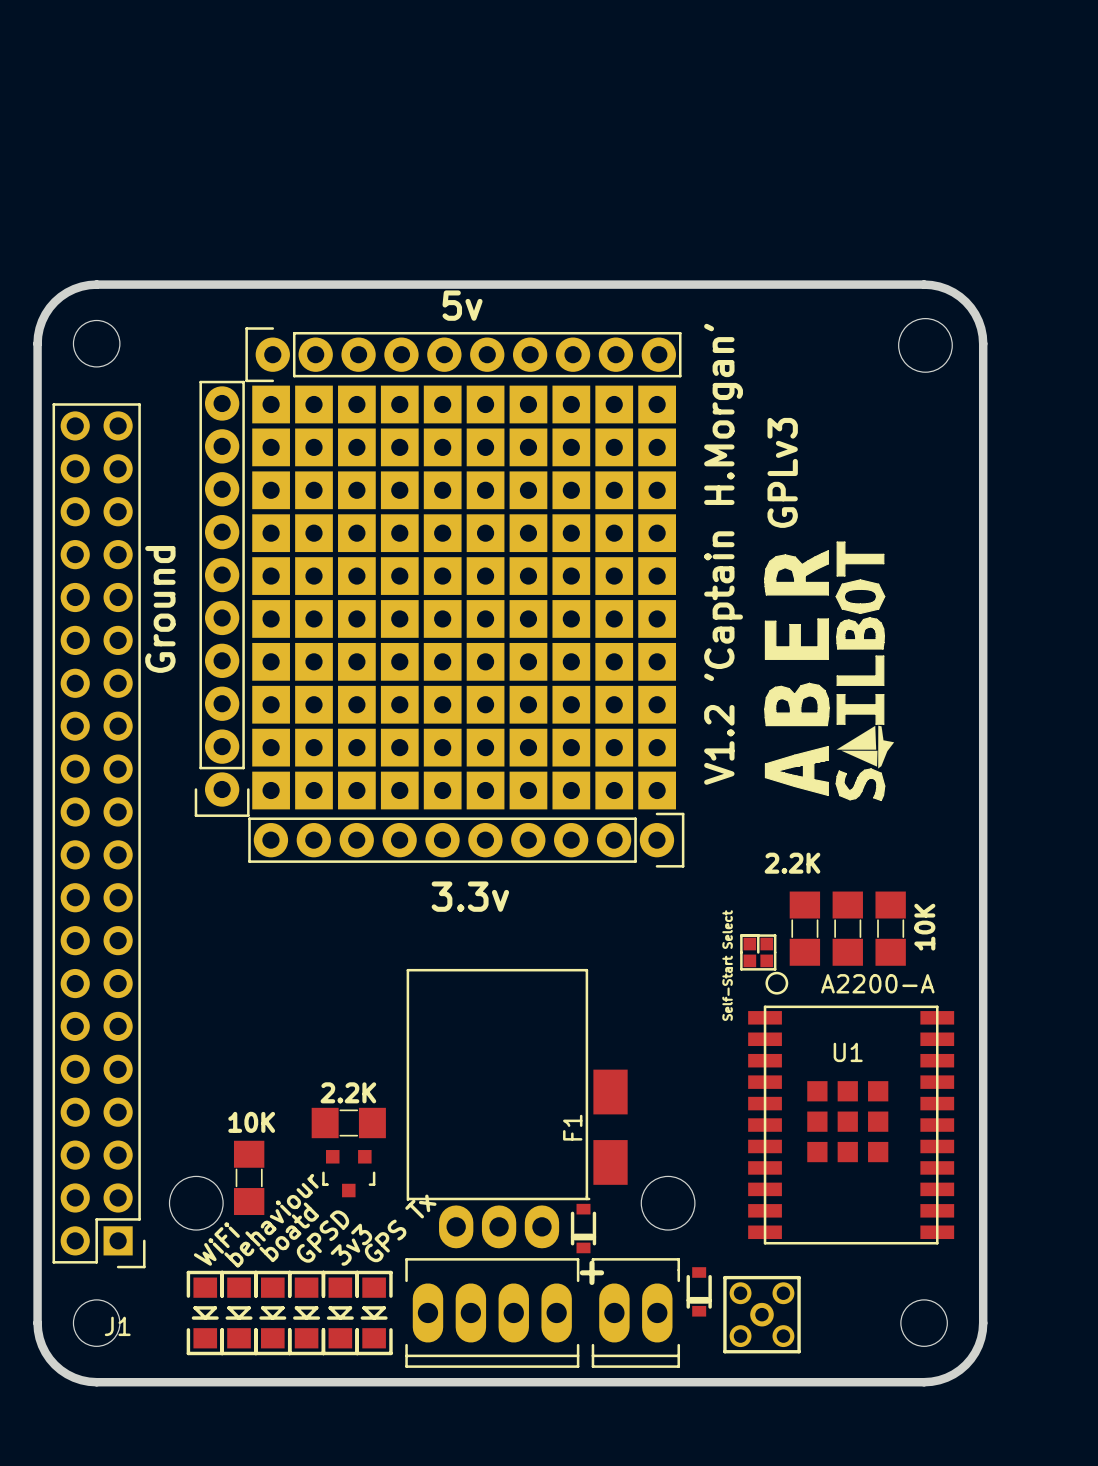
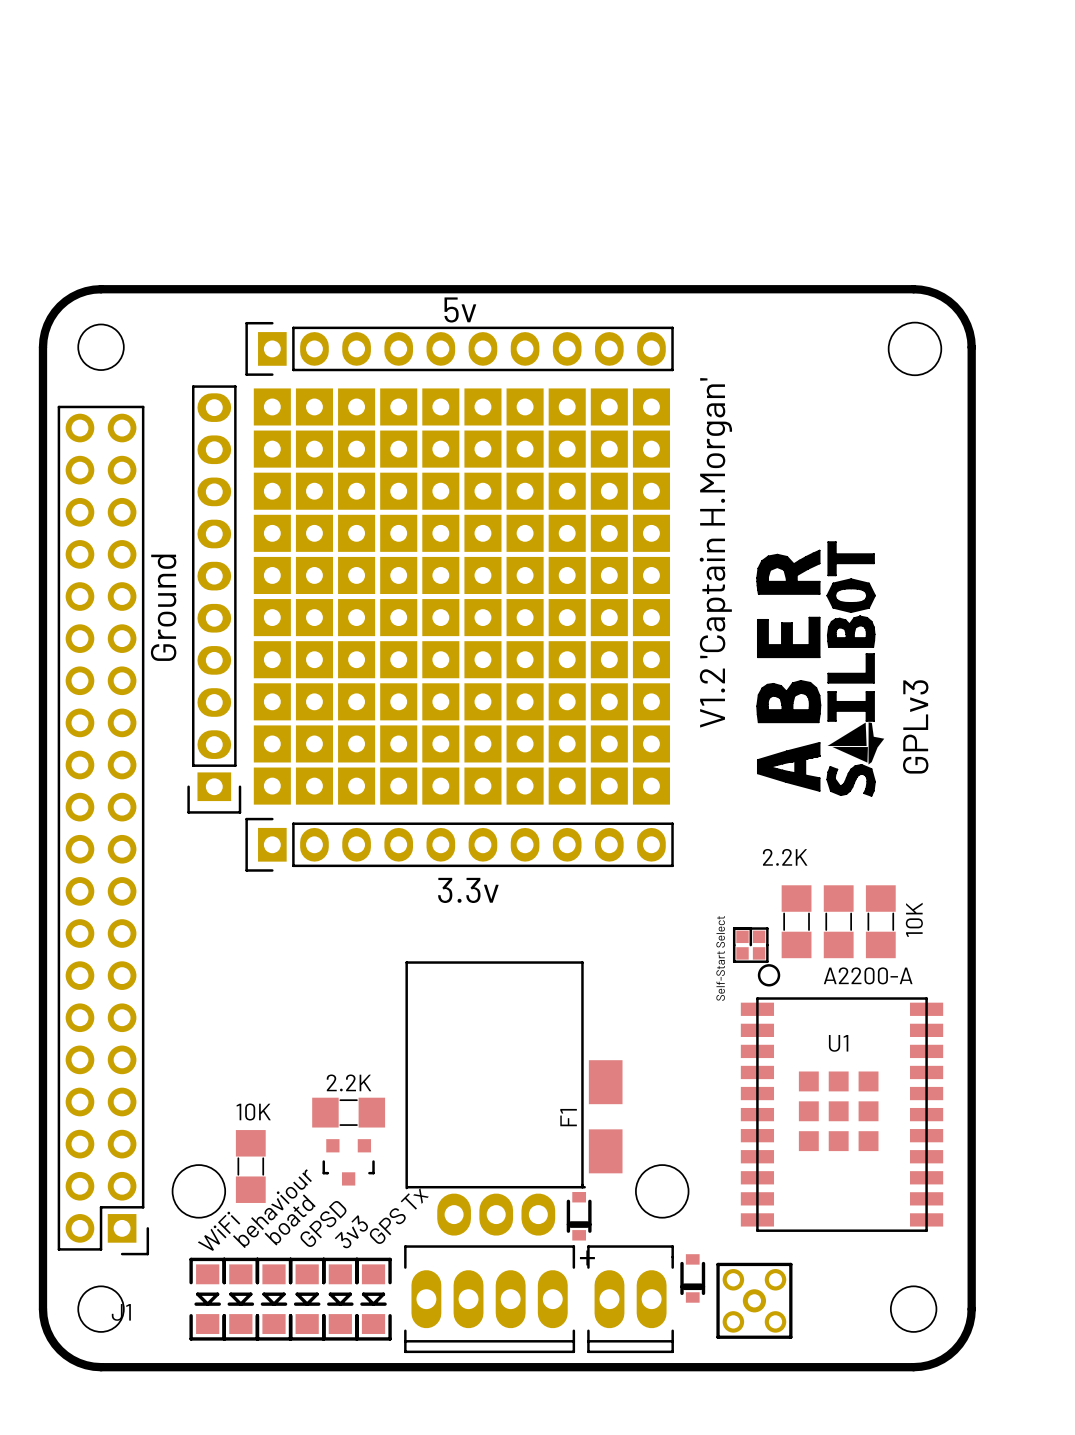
part footprint: [245, 327, 682, 383] -> [245, 321, 674, 376]
part footprint: [194, 380, 250, 817] -> [187, 385, 242, 814]
text position: GPLv3 (782, 472) -> GPLv3 (915, 726)
part footprint: [248, 812, 685, 868] -> [245, 817, 674, 872]

